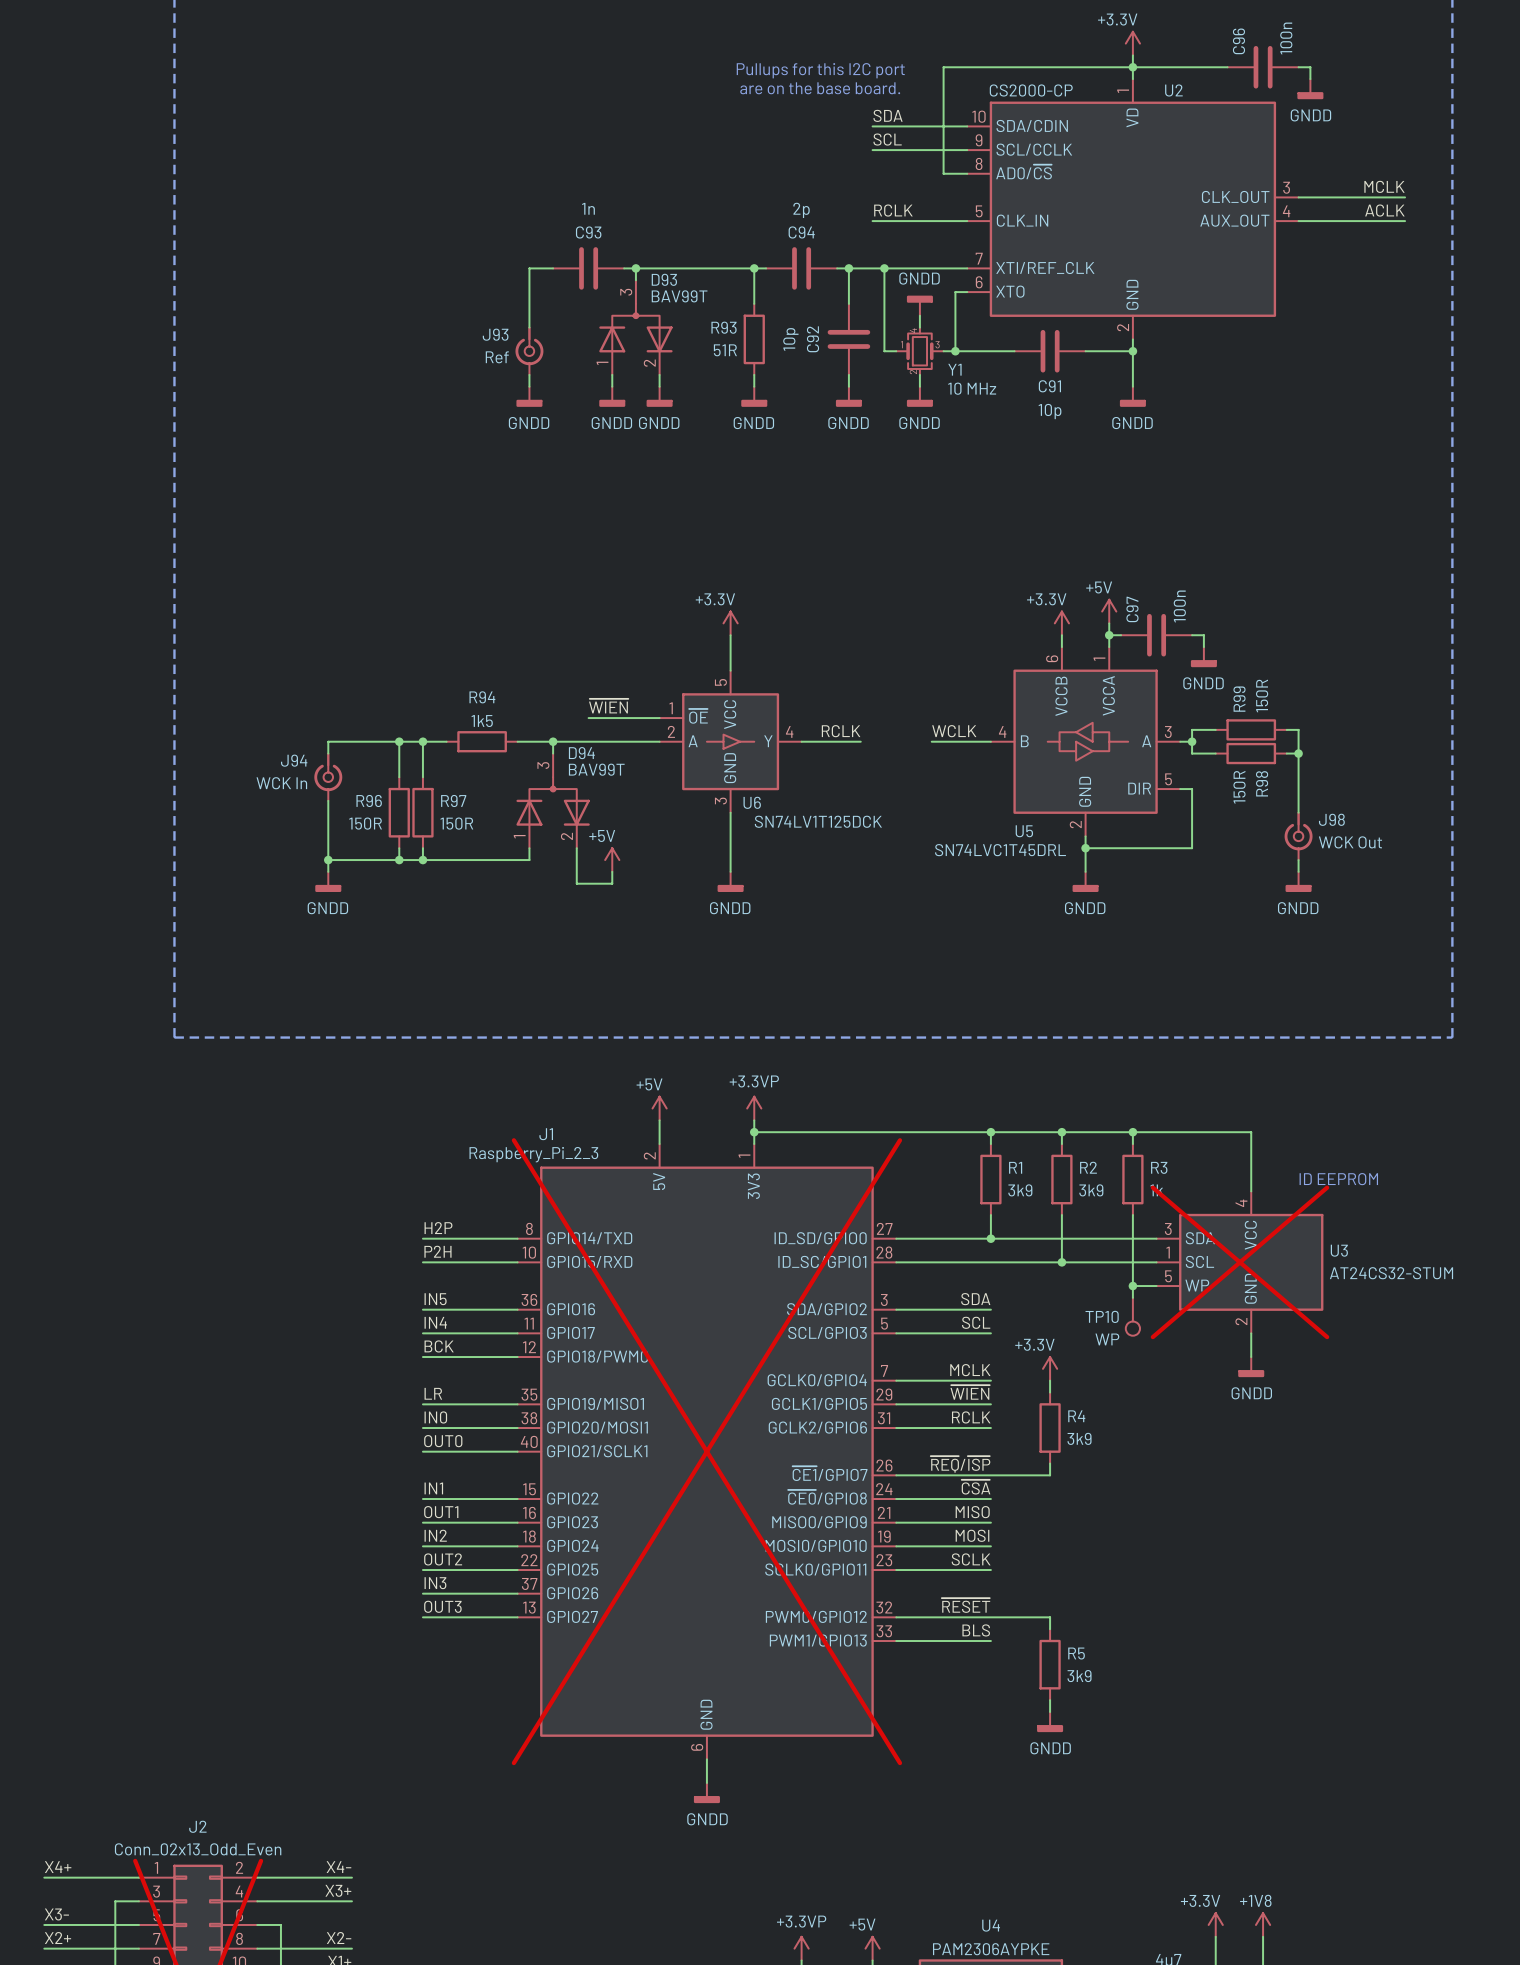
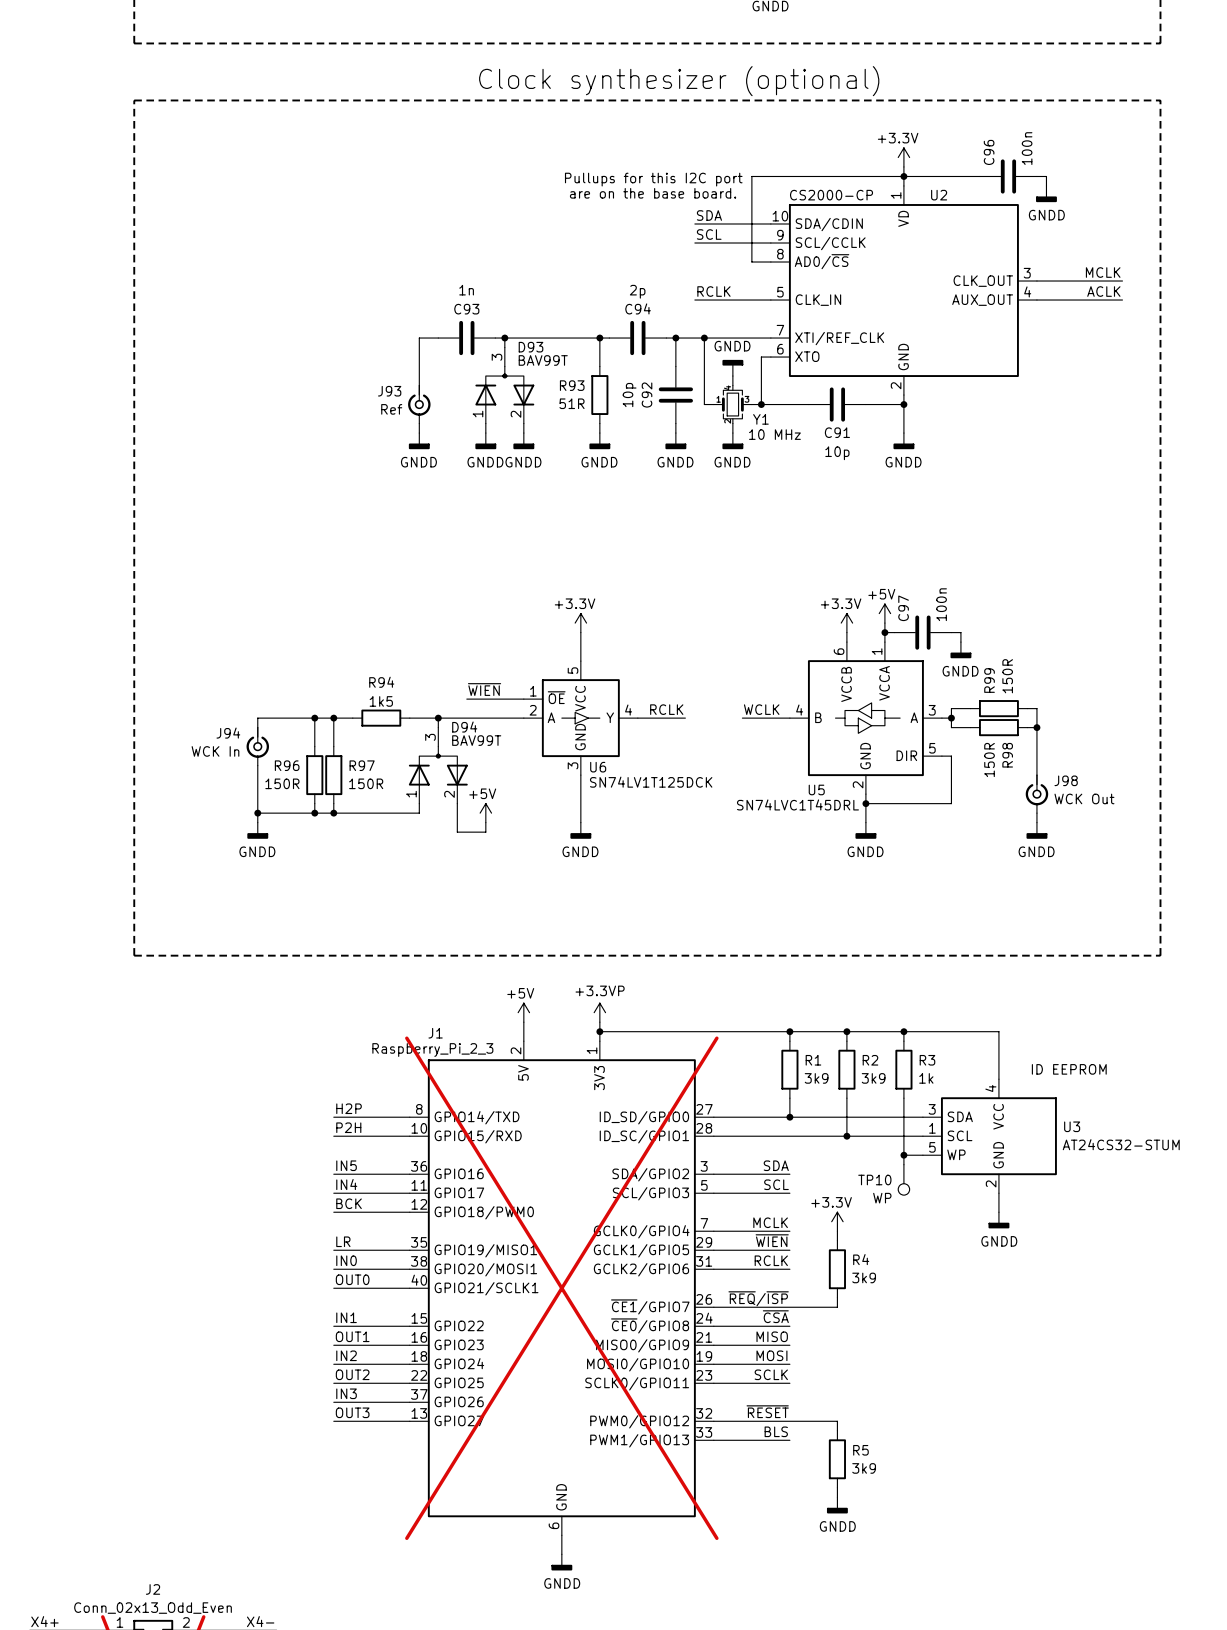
U3 do-not-place cross: (1239, 1262) -> none

